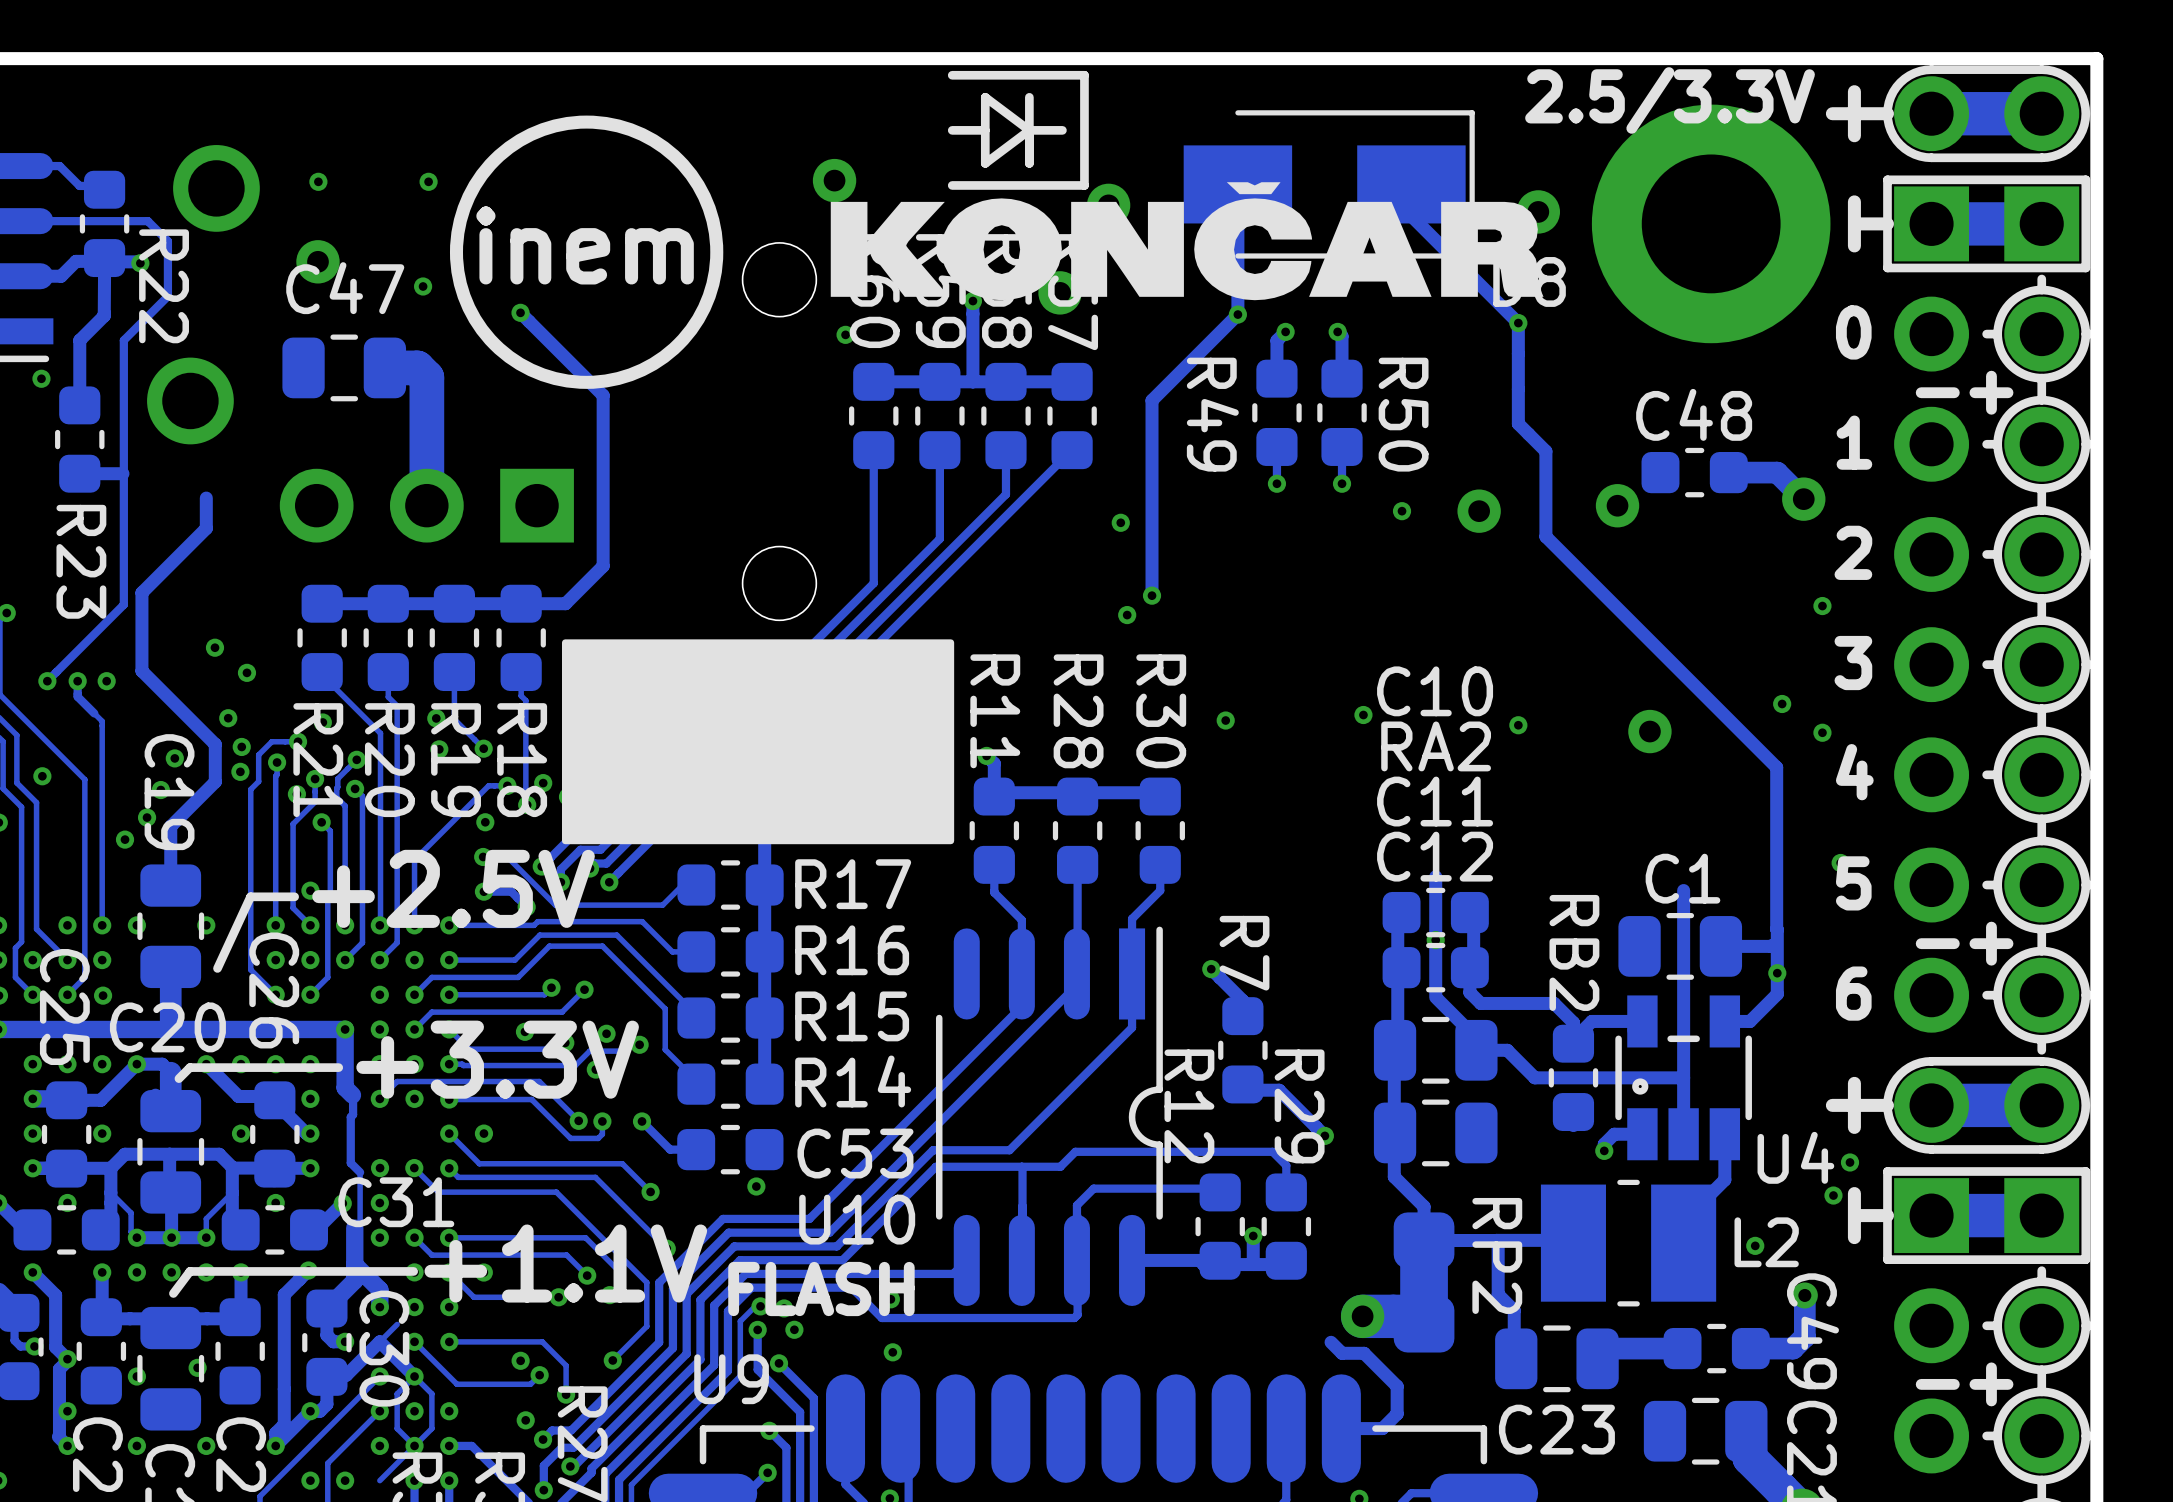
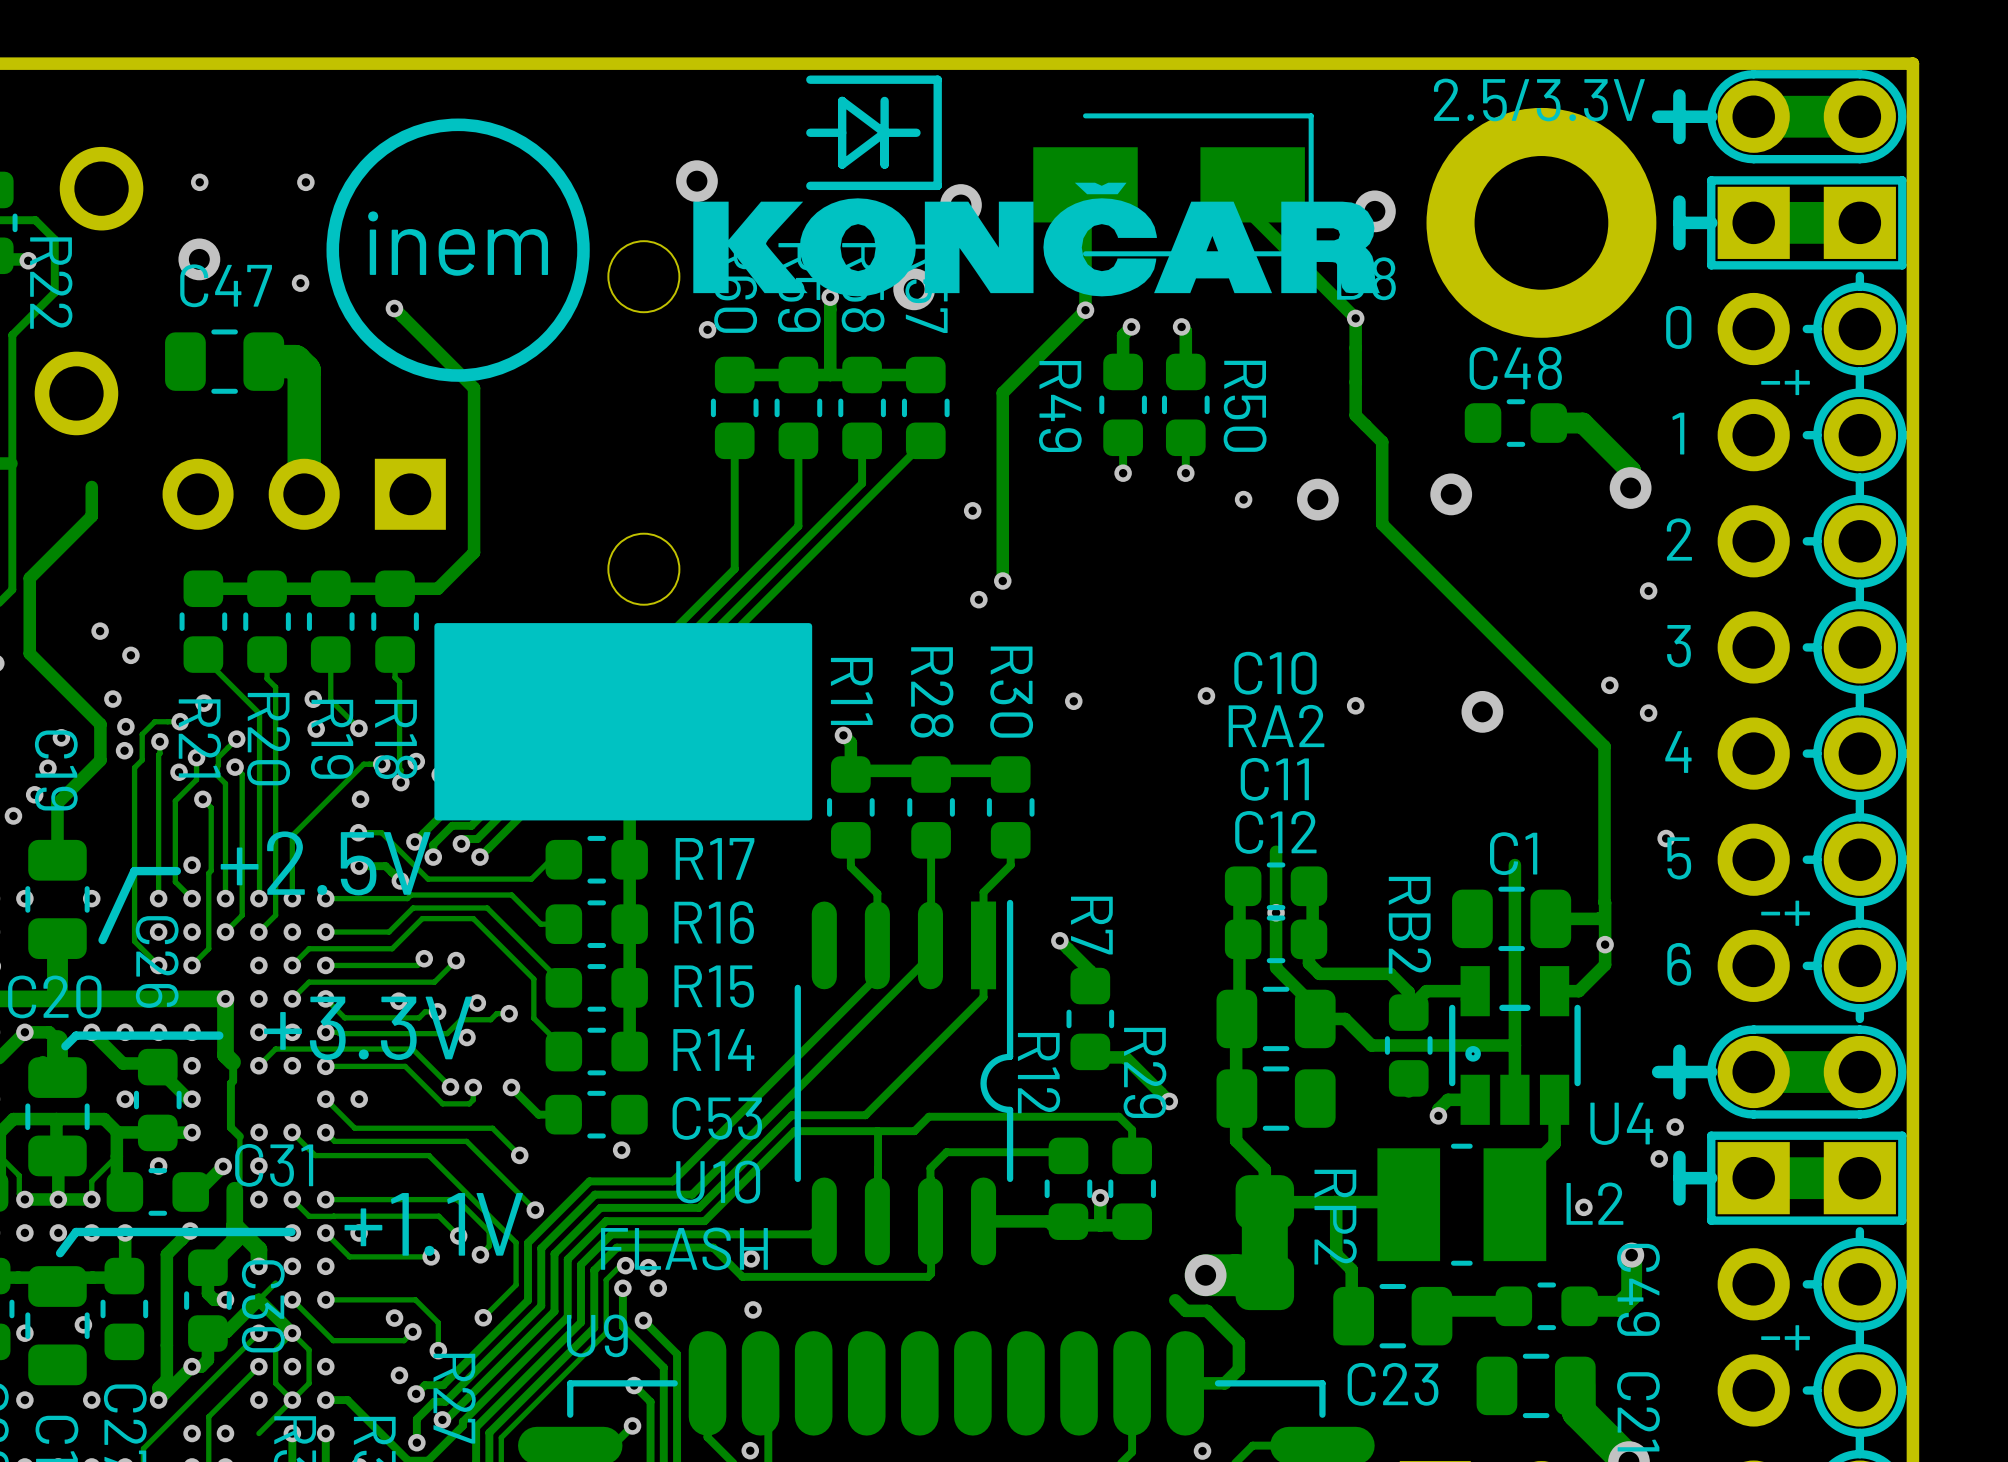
C48 position: (1694, 472) -> (1515, 423)
track: (1738, 472) (1777, 472) (1803, 499) -> (1549, 423) (1582, 423) (1630, 470) (1630, 488)

